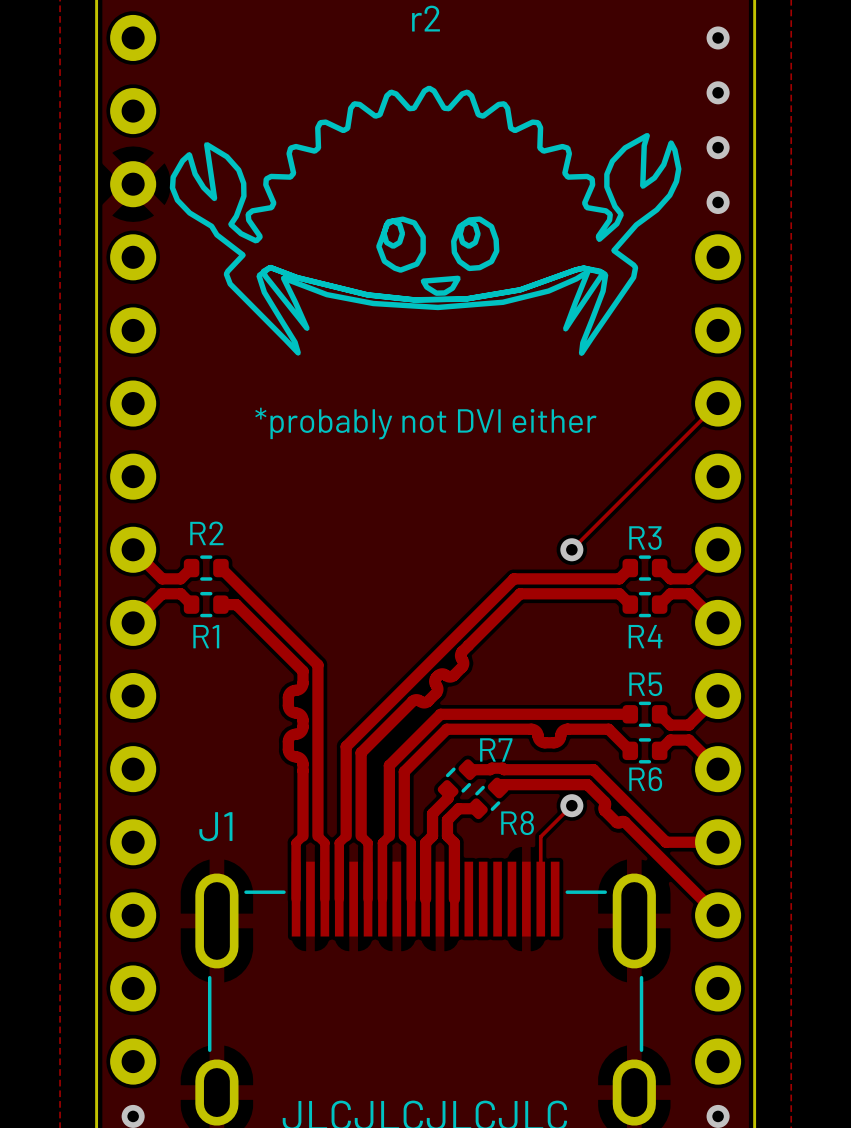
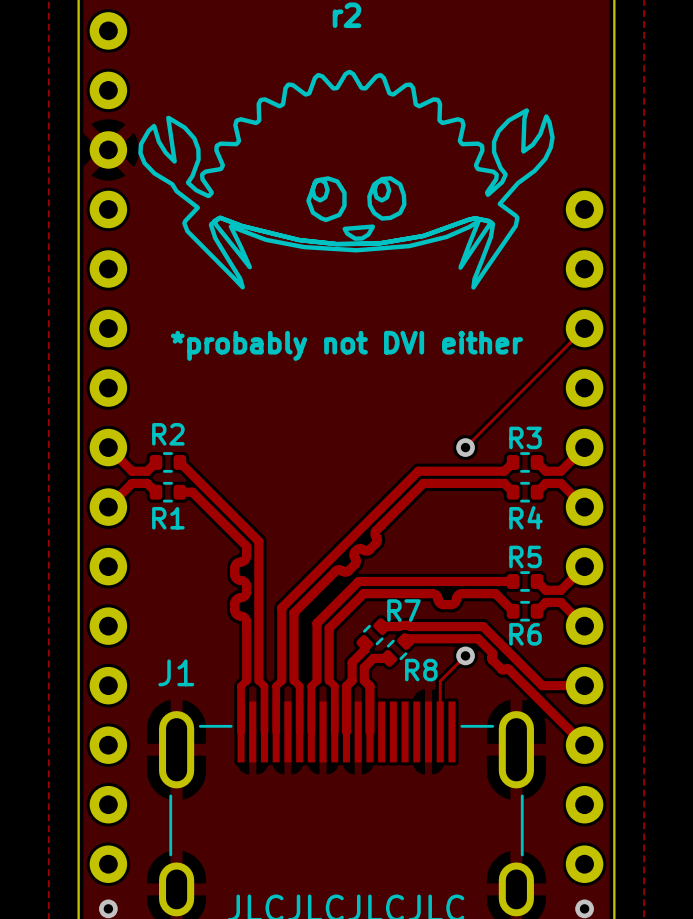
via: (718, 37) -> none
via: (718, 92) -> none
via: (718, 147) -> none
via: (718, 202) -> none

